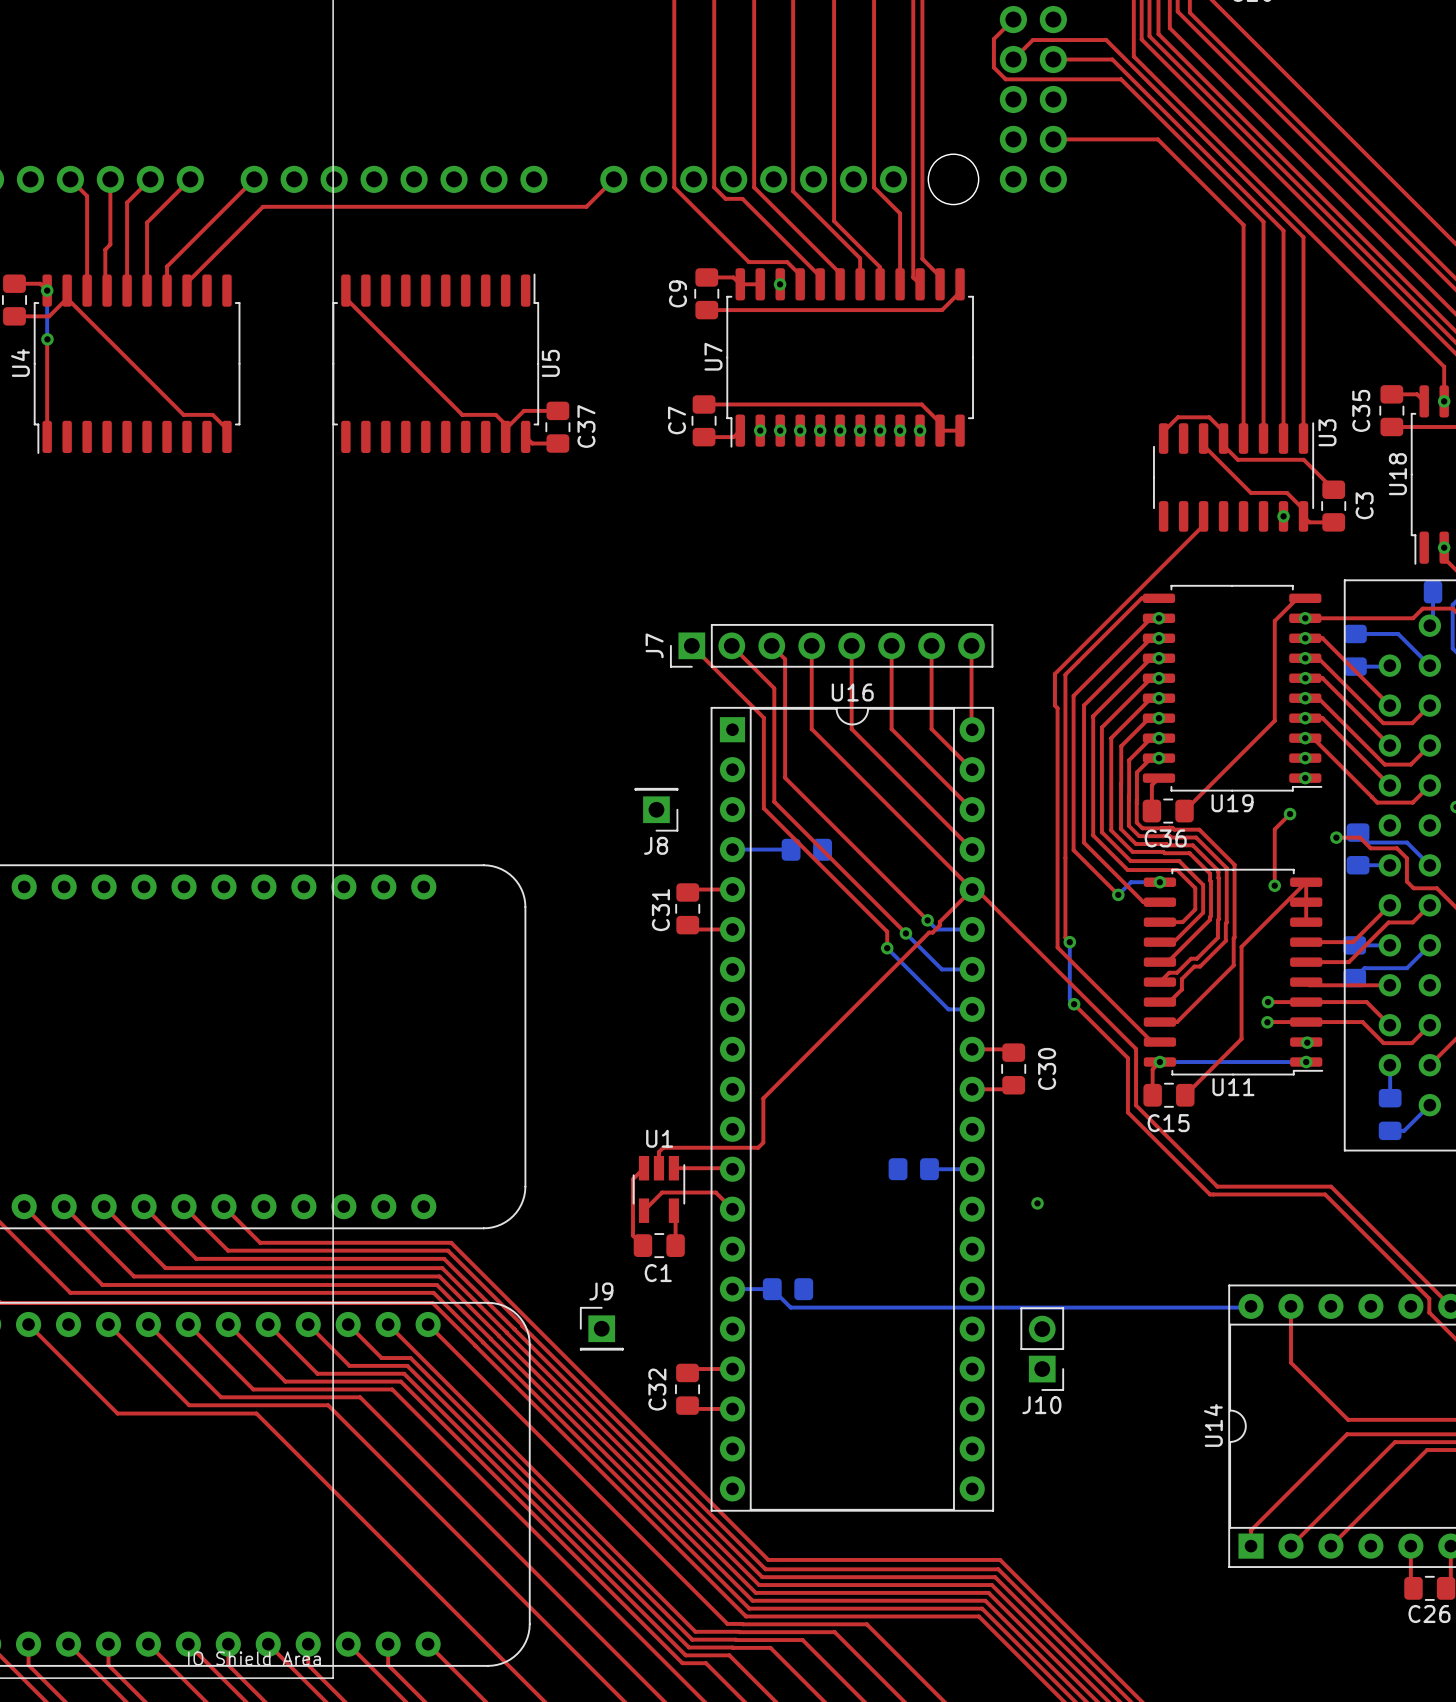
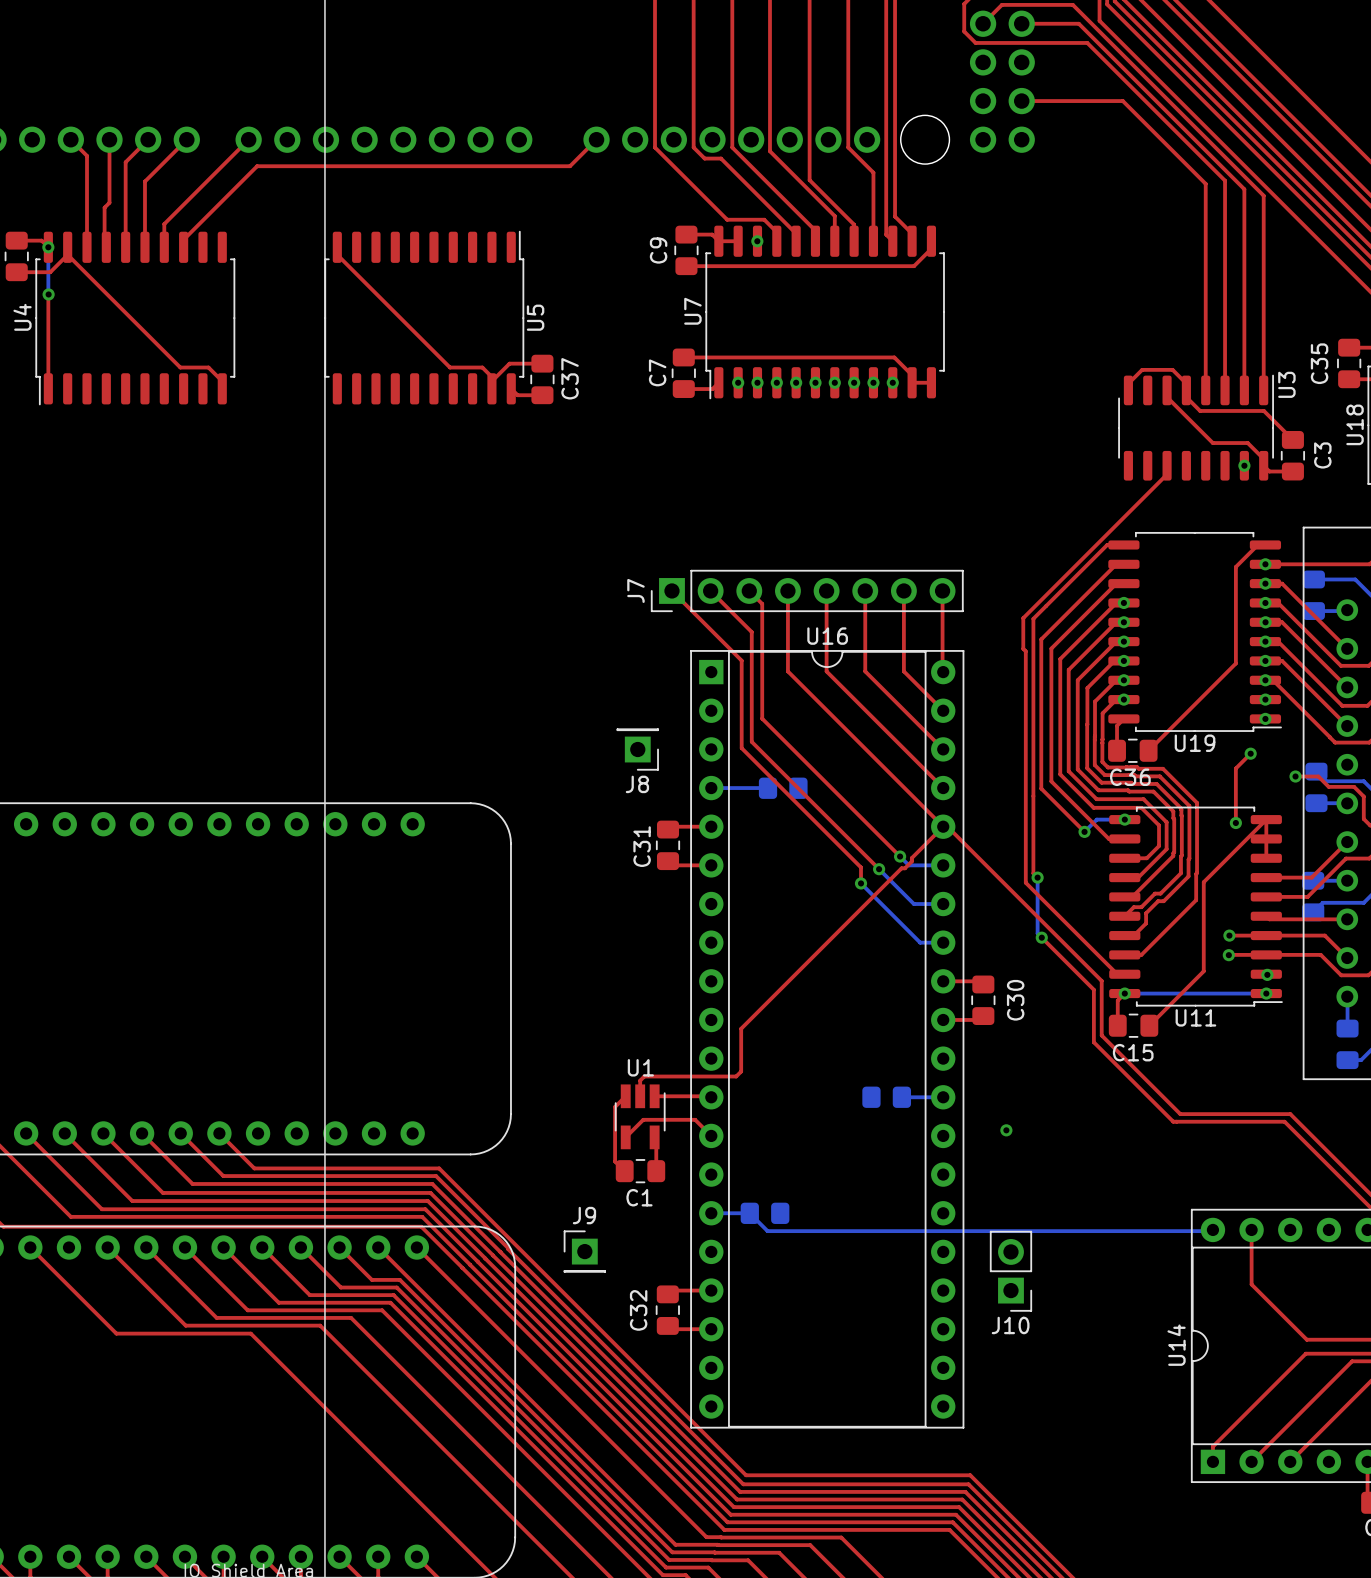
via: (1158, 618) -> none
via: (1158, 638) -> none

